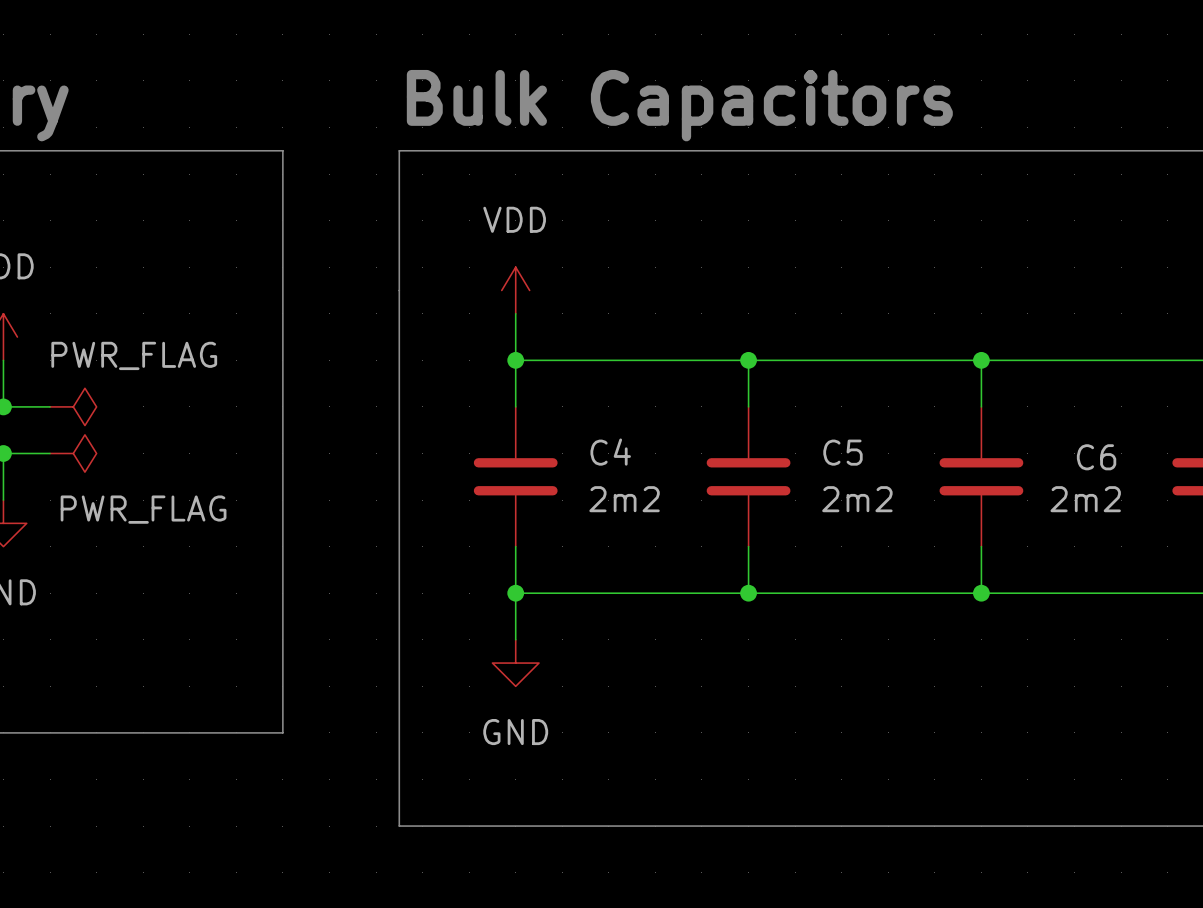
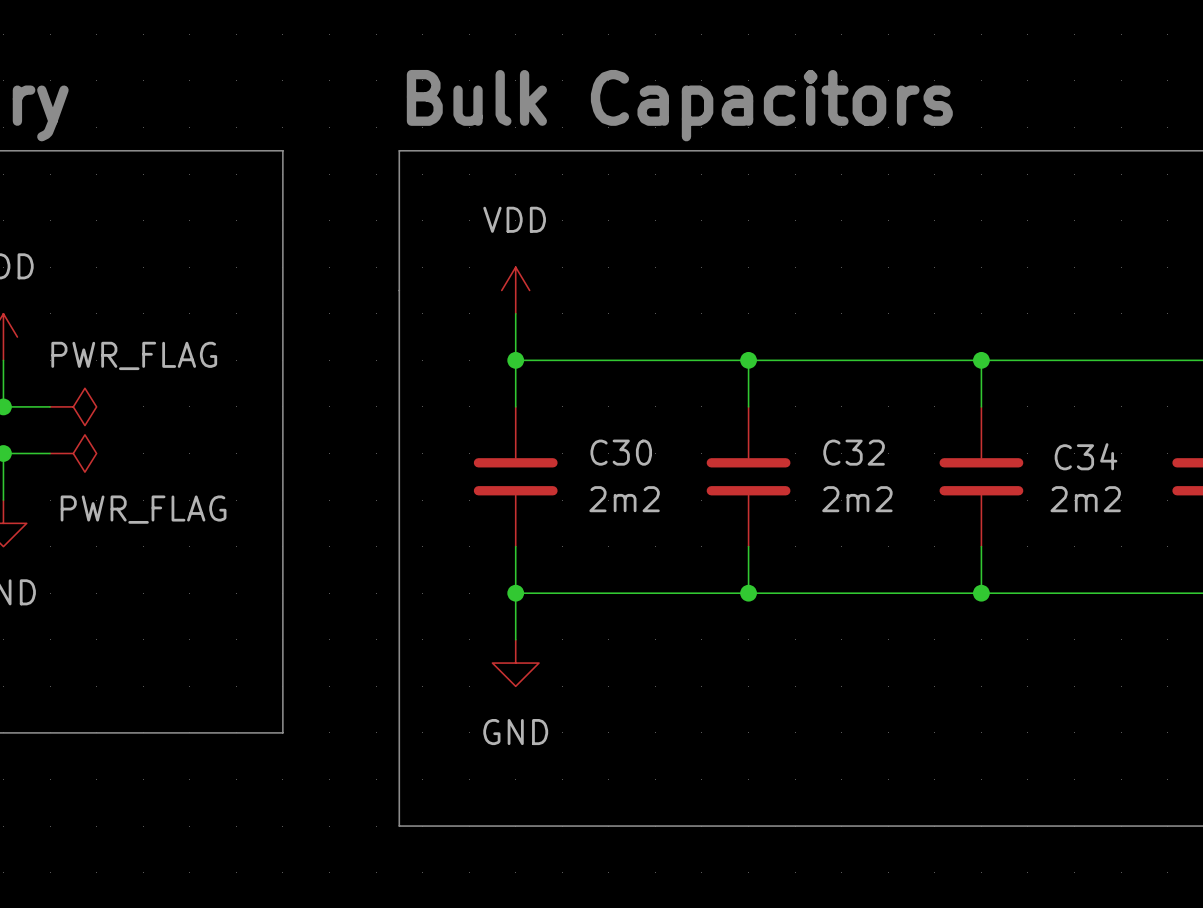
C4 name: C4 (610, 452) -> C30 (621, 452)
C5 name: C5 (842, 452) -> C32 (854, 452)
C6 name: C6 (1096, 457) -> C34 (1086, 456)

